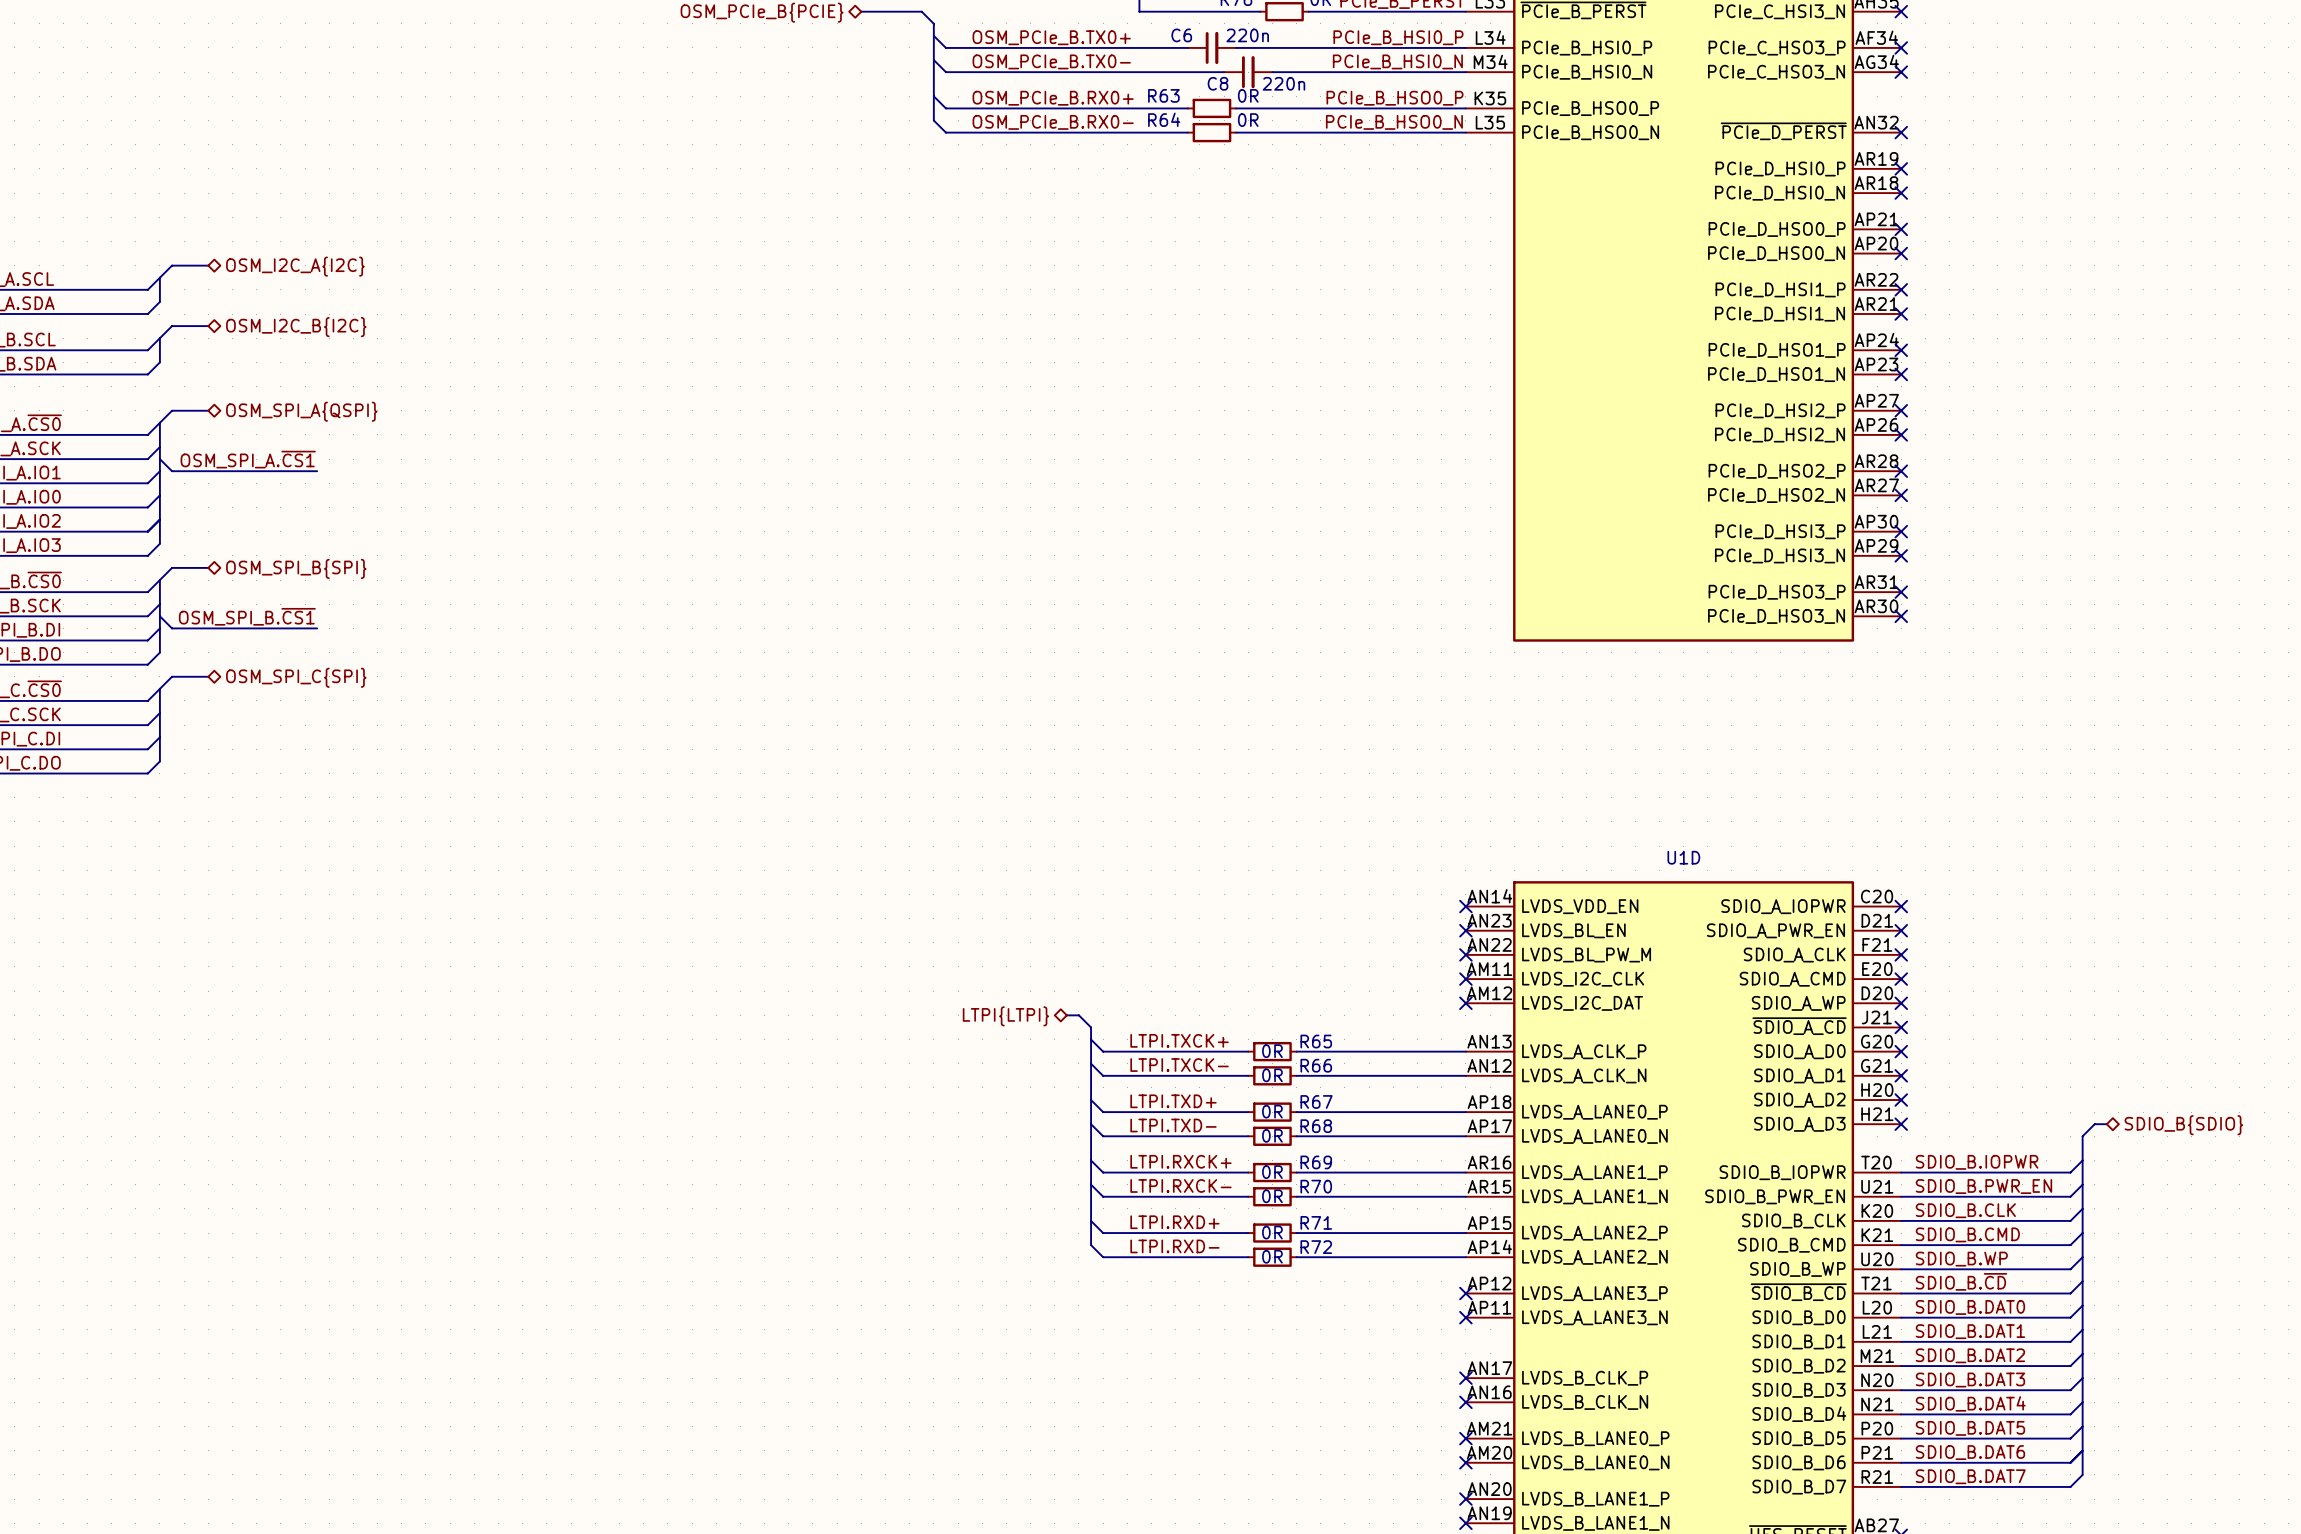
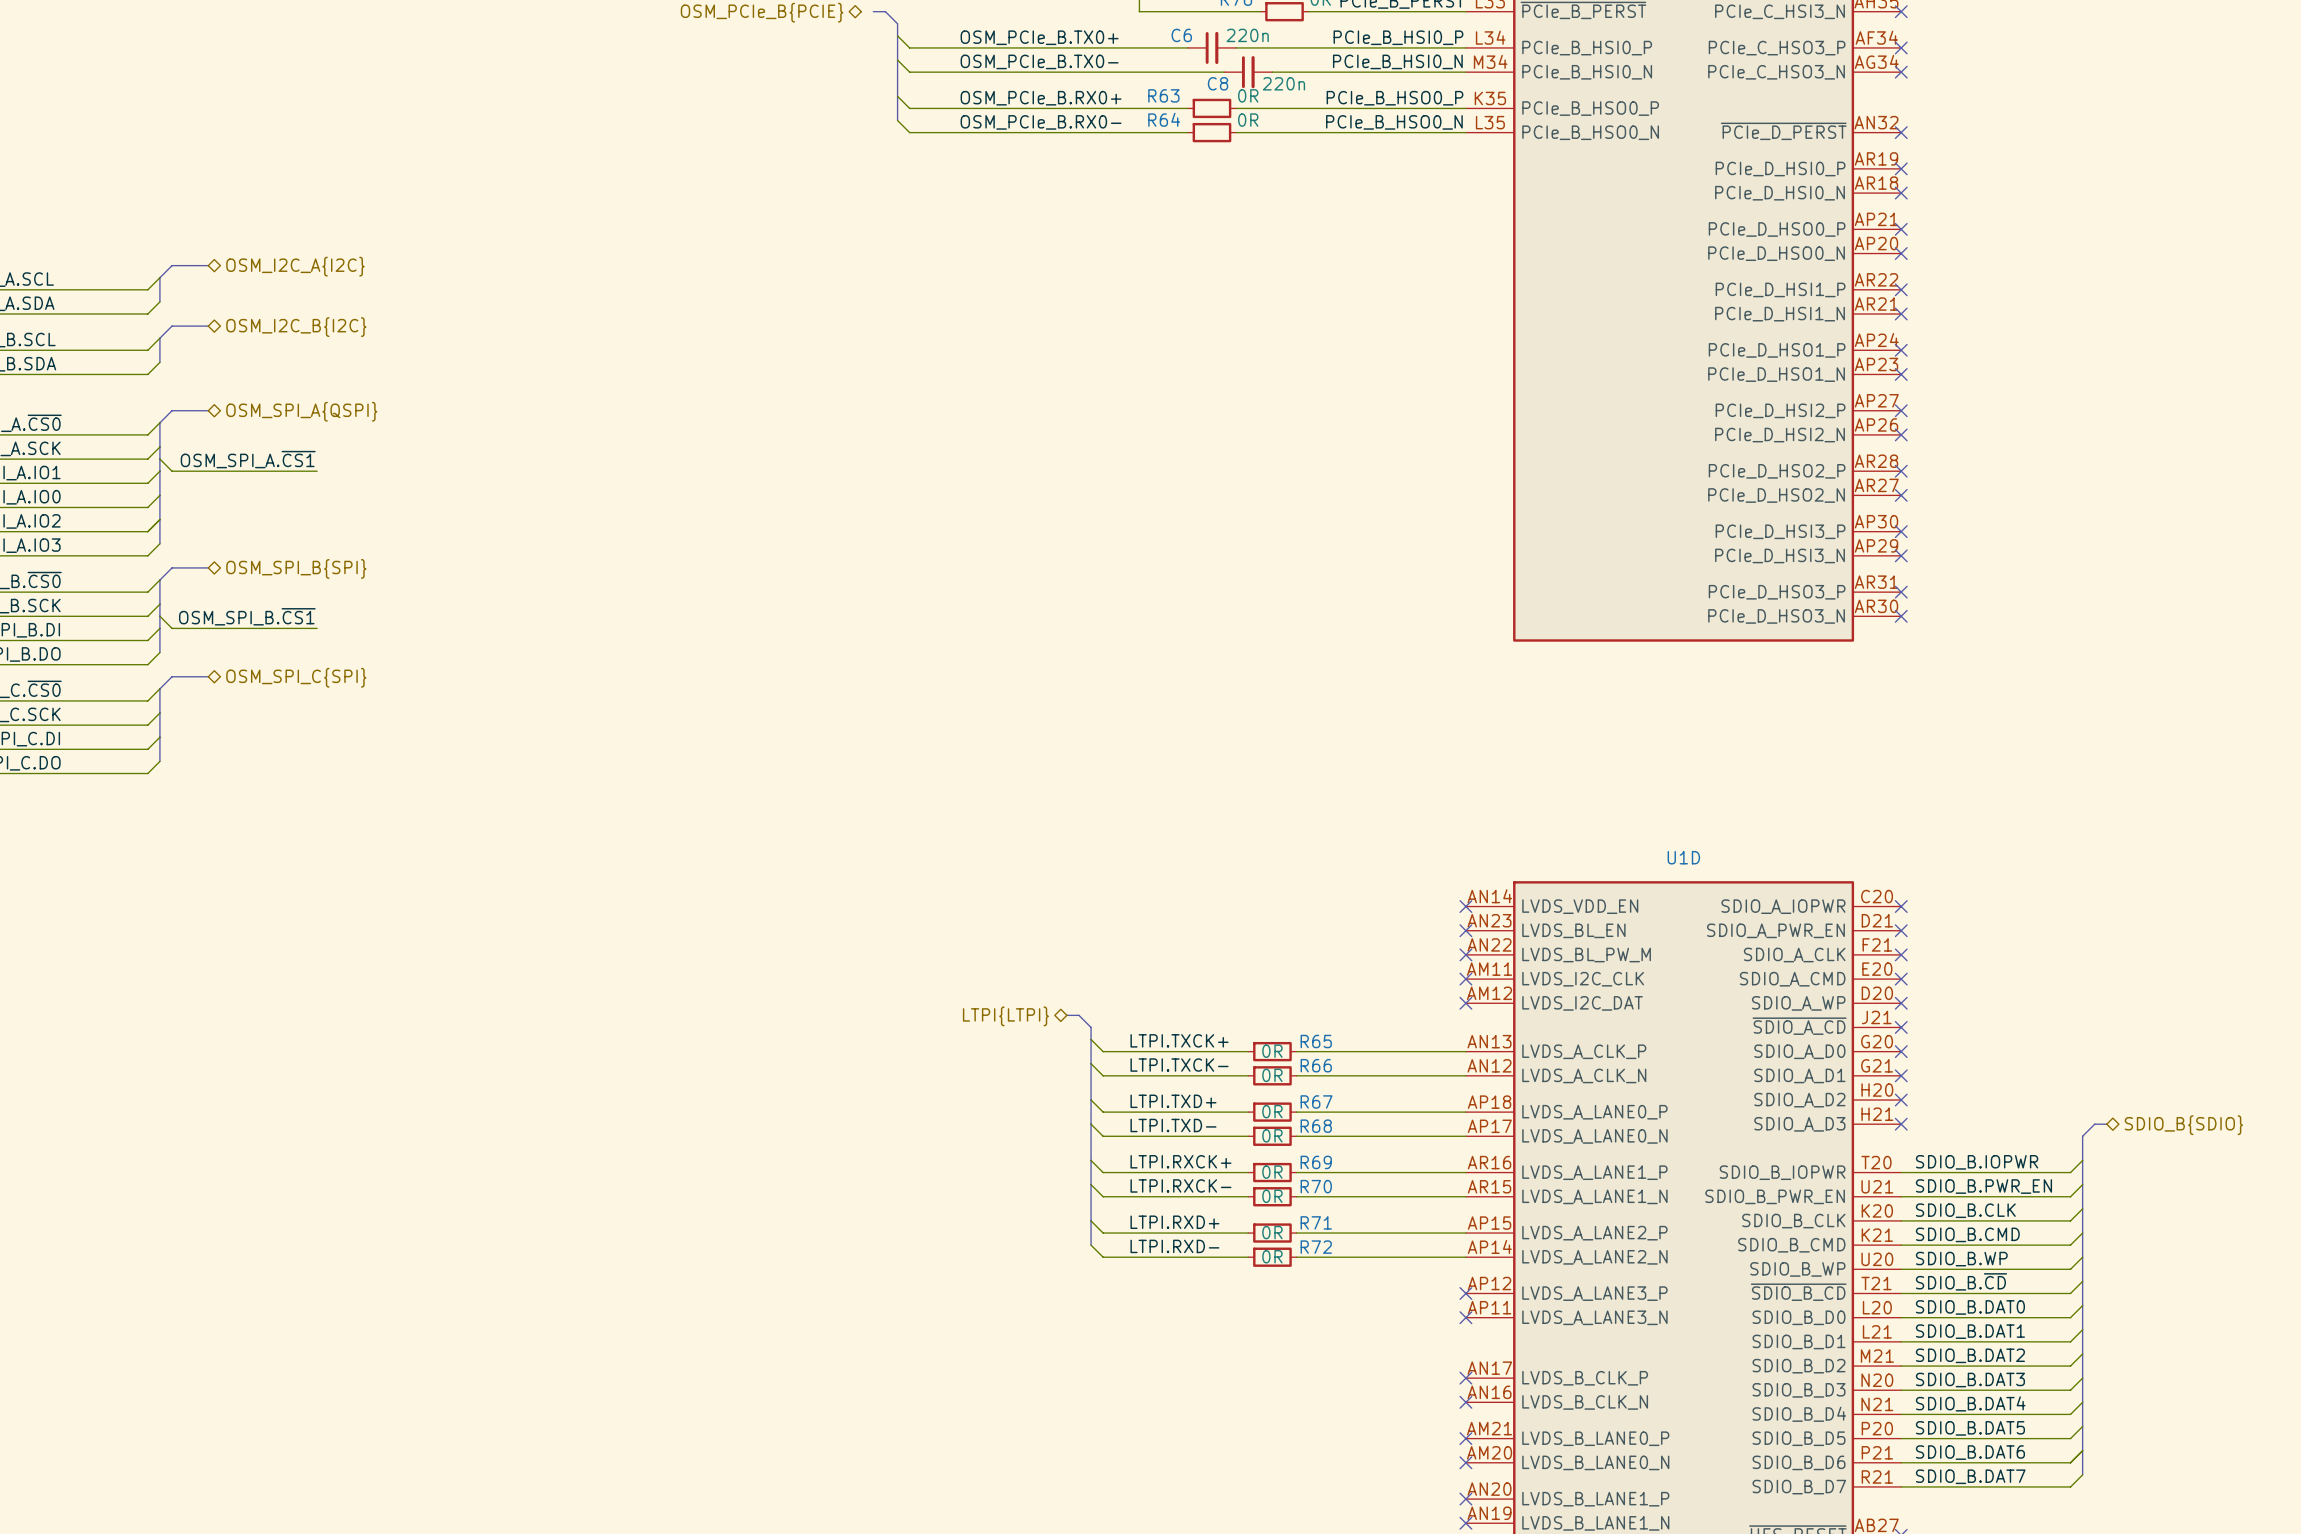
bus: (861, 11) (873, 11) -> none
bus: (885, 11) (921, 11) (933, 23) (933, 120) -> (885, 11) (897, 23) (897, 120)
wire: (933, 35) (945, 47) -> (897, 35) (909, 47) (945, 47)
label position: OSM_PCIe_B.TX0+ (1051, 37) -> OSM_PCIe_B.TX0+ (1039, 37)
wire: (933, 60) (945, 72) -> (897, 60) (909, 72) (945, 72)
label position: OSM_PCIe_B.TX0- (1051, 61) -> OSM_PCIe_B.TX0- (1039, 61)
wire: (933, 96) (945, 108) -> (897, 96) (909, 108) (945, 108)
label position: OSM_PCIe_B.RX0+ (1053, 98) -> OSM_PCIe_B.RX0+ (1041, 98)
wire: (933, 120) (945, 132) -> (897, 120) (909, 132) (945, 132)
label position: OSM_PCIe_B.RX0- (1053, 122) -> OSM_PCIe_B.RX0- (1041, 122)

